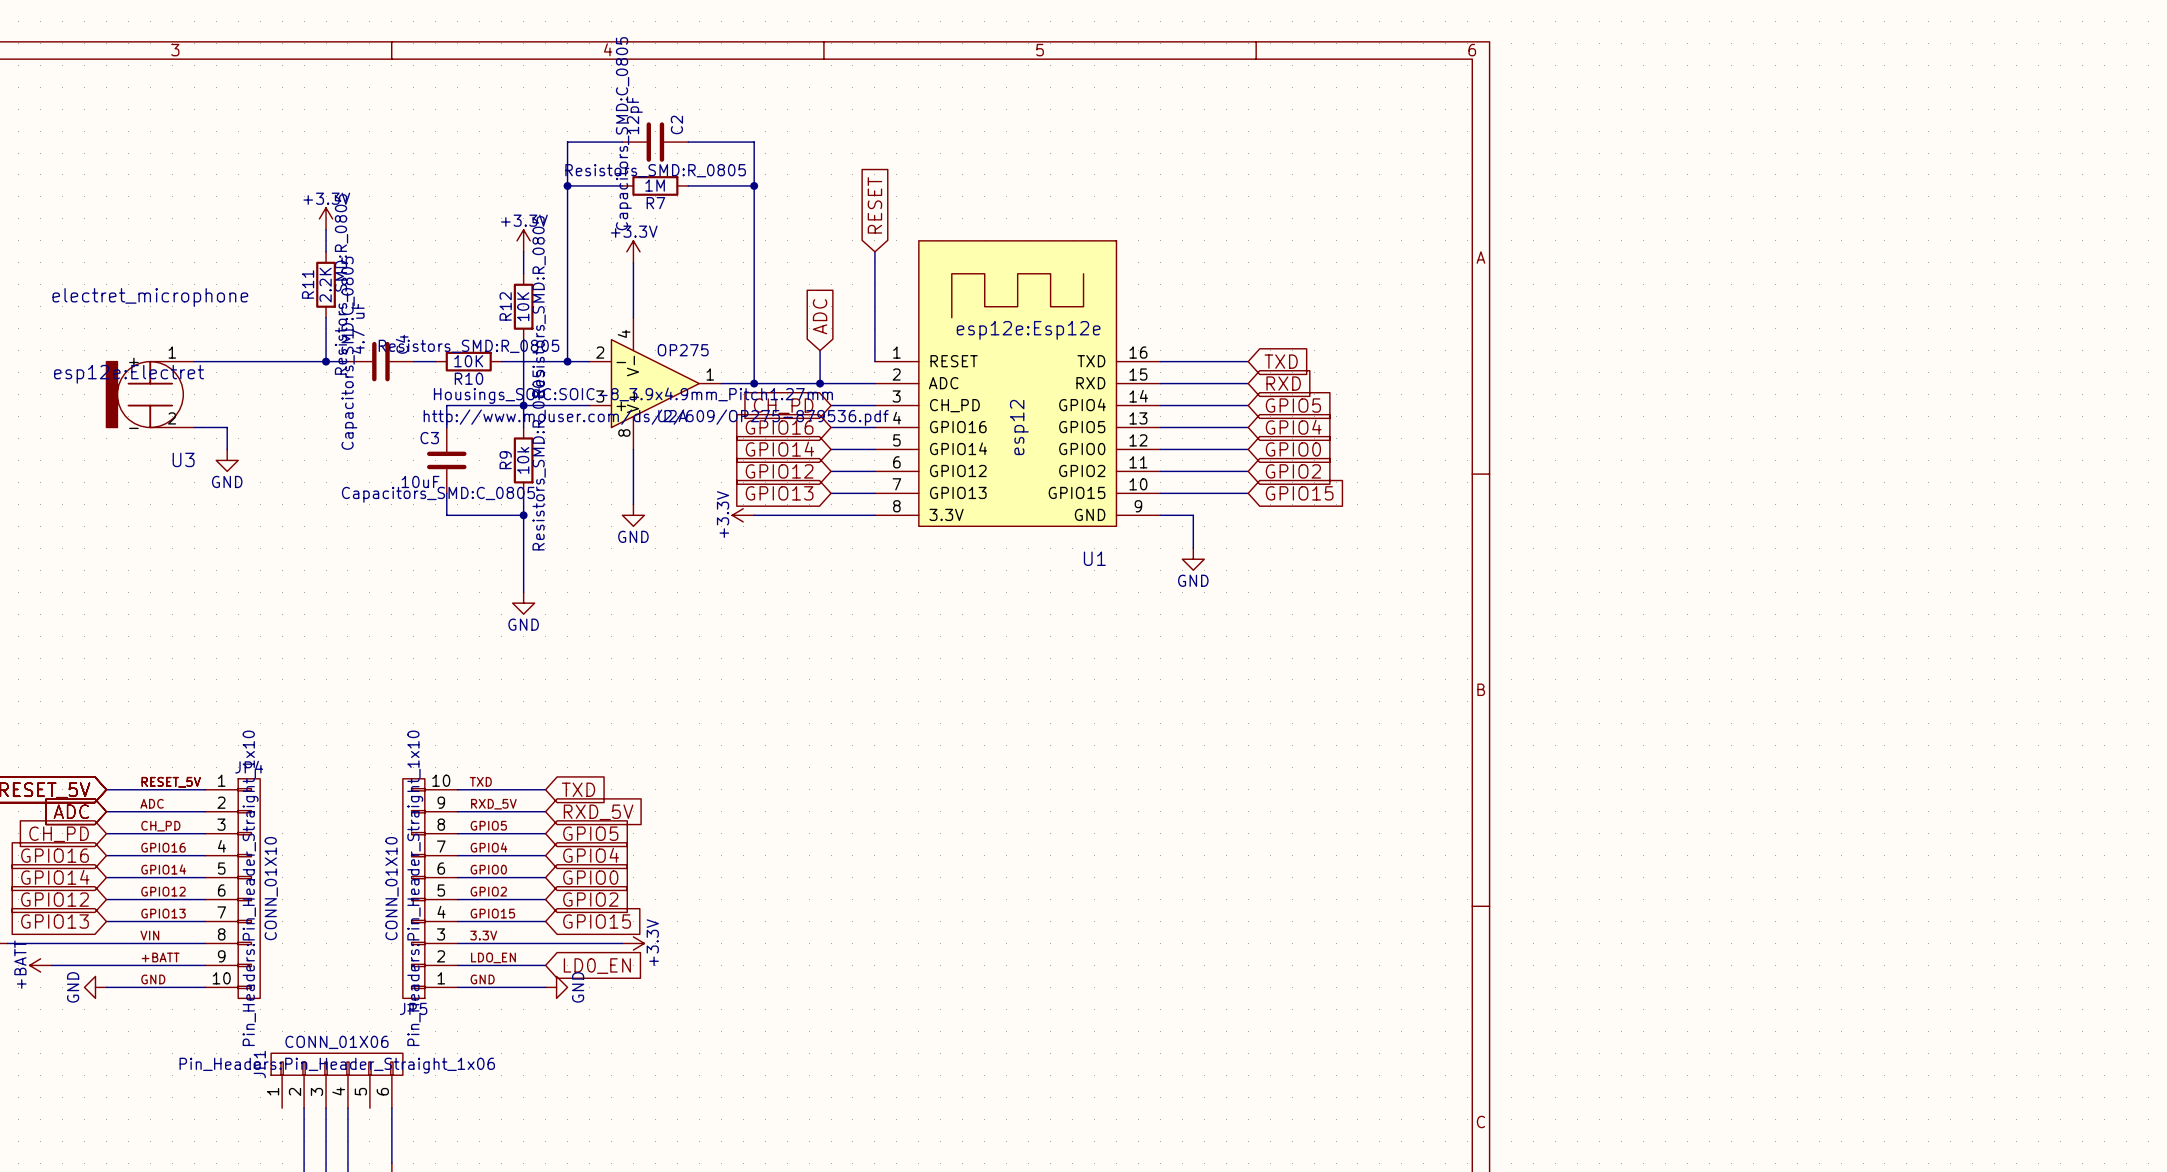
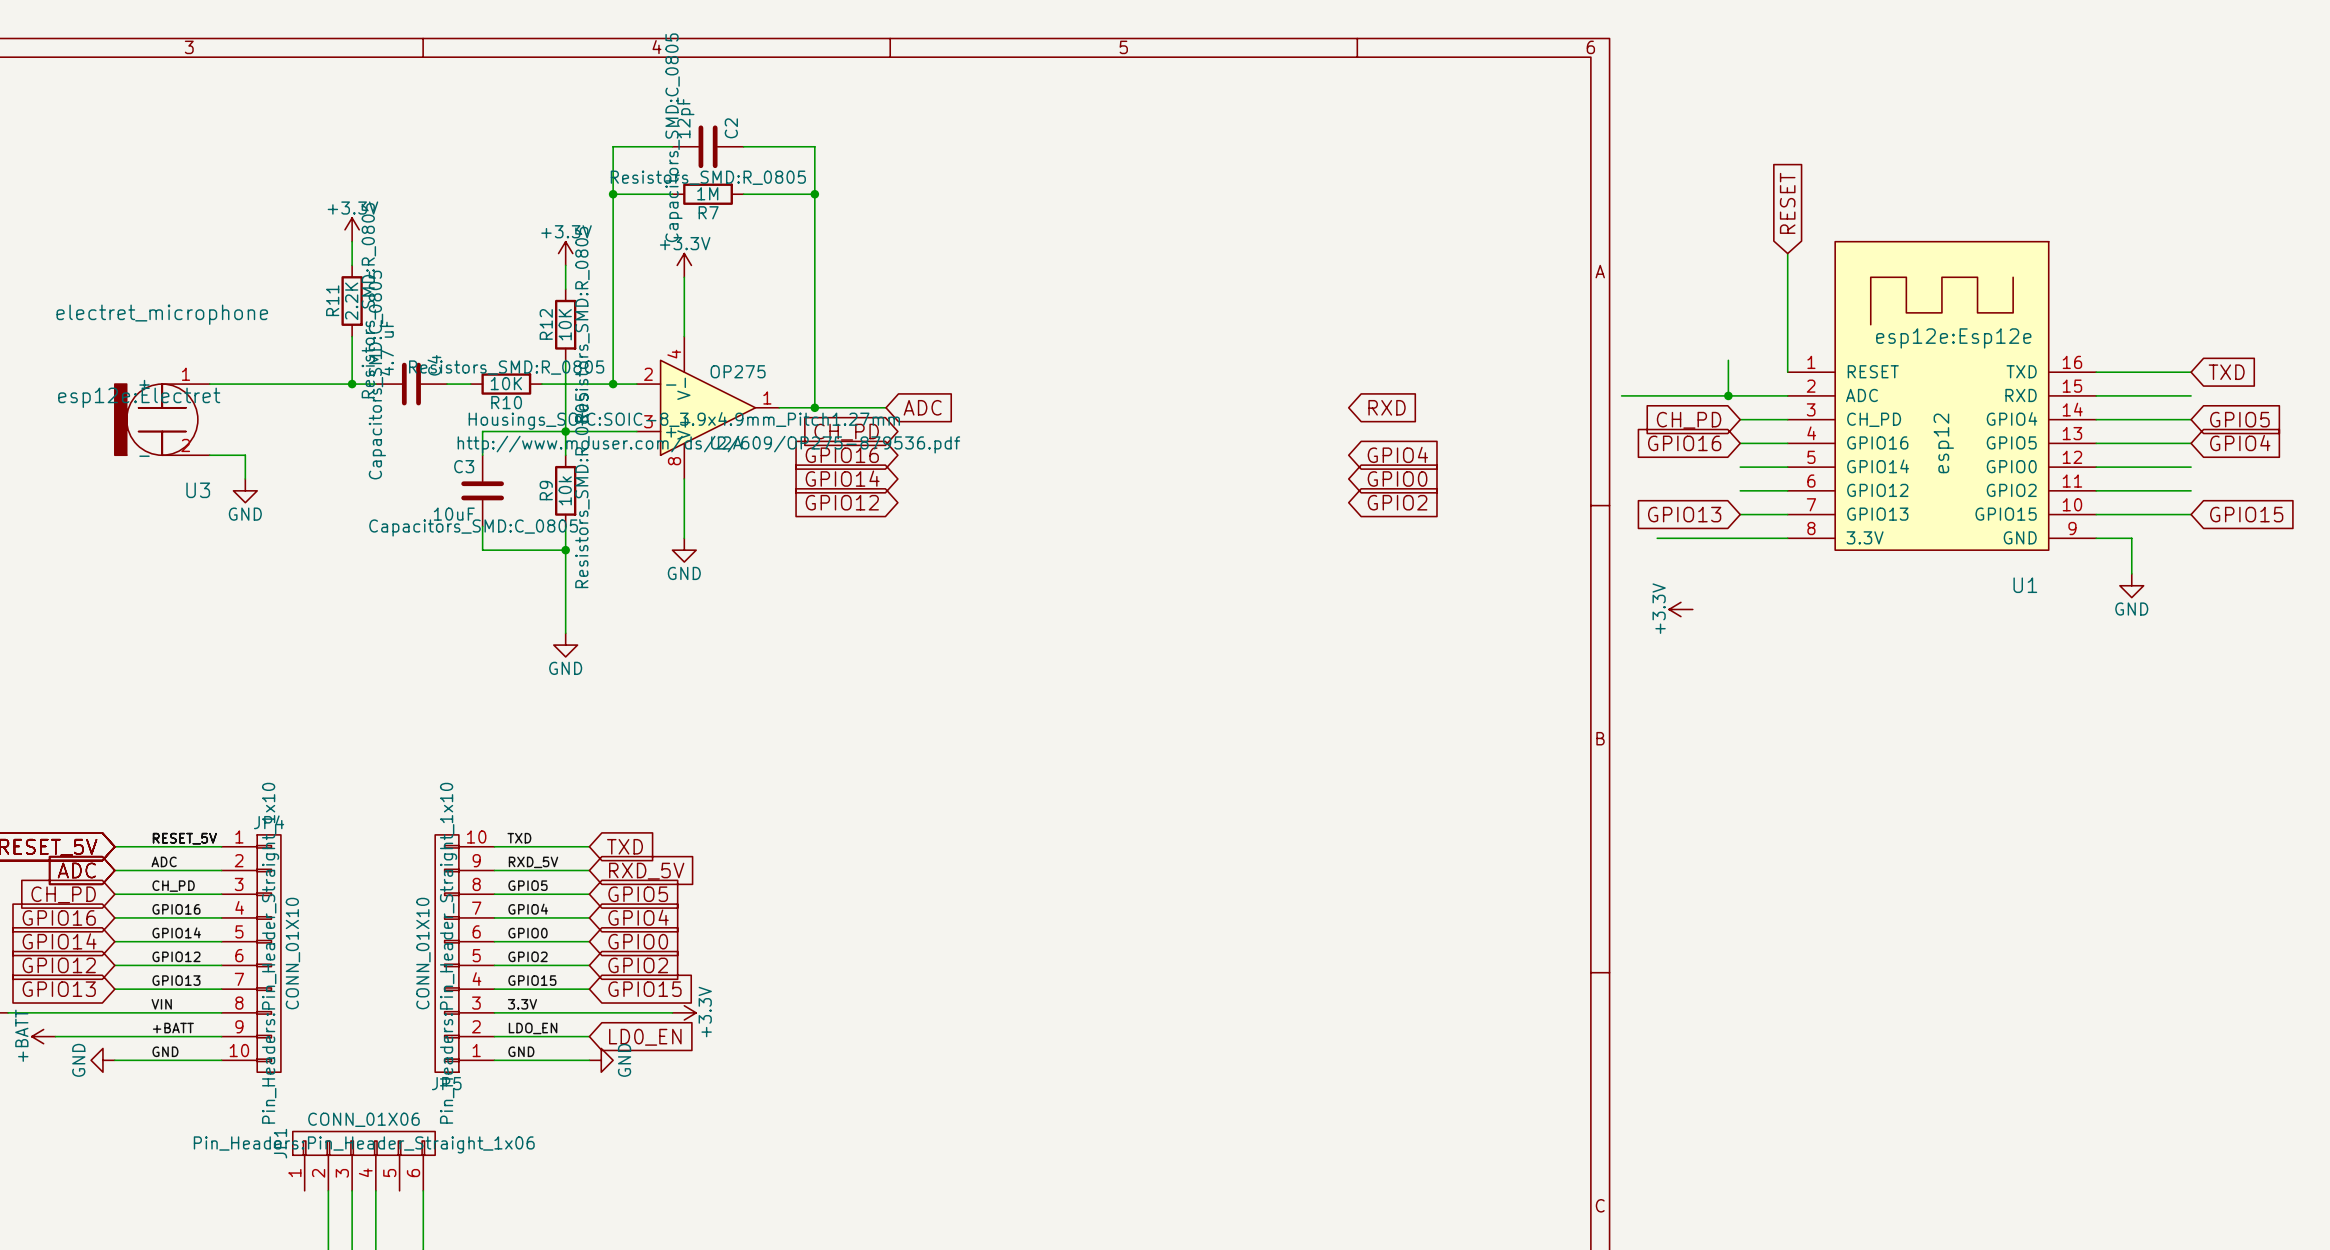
global label: none -> RESET (1787, 203)
global label: RESET (874, 205) -> none
wire: none -> (1787, 253) (1787, 372)
wire: (874, 251) (874, 361) -> none
global label rotation: 0° (820, 316) -> 90° clockwise (922, 407)
global label position: ADC (820, 316) -> ADC (922, 407)
wire: none -> (1728, 360) (1728, 395)
wire: (820, 350) (820, 383) (874, 383) -> none
wire: none -> (2096, 372) (2191, 372)
global label: none -> TXD (2226, 372)
wire: (1160, 361) (1248, 361) -> none
global label: TXD (1281, 361) -> none
wire: none -> (1621, 395) (1787, 395)
junction: none -> (1728, 395)
wire: none -> (2096, 395) (2191, 395)
junction: (820, 383) -> none
U1 position: (1017, 383) -> (1941, 395)
wire: (1160, 383) (1248, 383) -> none
wire: none -> (1740, 419) (1787, 419)
wire: none -> (2096, 419) (2191, 419)
global label: none -> GPIO5 (2239, 419)
global label: none -> CH_PD (1689, 420)
wire: (831, 405) (874, 405) -> none
wire: (1160, 405) (1248, 405) -> none
global label: GPIO5 (1293, 405) -> none
global label: none -> GPIO16 (1684, 443)
wire: none -> (1740, 443) (1787, 443)
wire: none -> (2096, 443) (2191, 443)
global label: none -> GPIO4 (2240, 443)
wire: (831, 427) (874, 427) -> none
wire: (1160, 427) (1248, 427) -> none
wire: none -> (1740, 467) (1787, 467)
wire: none -> (2096, 467) (2191, 467)
wire: (831, 449) (874, 449) -> none
wire: (1160, 449) (1248, 449) -> none
wire: none -> (1740, 490) (1787, 490)
wire: none -> (2096, 490) (2191, 490)
wire: (831, 471) (874, 471) -> none
wire: (1160, 471) (1248, 471) -> none
global label: none -> GPIO13 (1684, 514)
wire: none -> (1740, 514) (1787, 514)
wire: none -> (2096, 514) (2191, 514)
global label: none -> GPIO15 (2246, 514)
global label: GPIO13 (779, 493) -> none
wire: (831, 493) (874, 493) -> none
wire: (1160, 493) (1248, 493) -> none
global label: GPIO15 (1299, 493) -> none
wire: none -> (1657, 538) (1787, 538)
wire: none -> (2096, 538) (2131, 538) (2131, 573)
power symbol: +3.3V (743, 515) -> none
wire: (754, 515) (874, 515) -> none
wire: (1160, 515) (1193, 515) (1193, 548) -> none
power symbol: none -> GND (2131, 585)
power symbol: GND (1193, 559) -> none
power symbol: none -> +3.3V (1680, 609)

